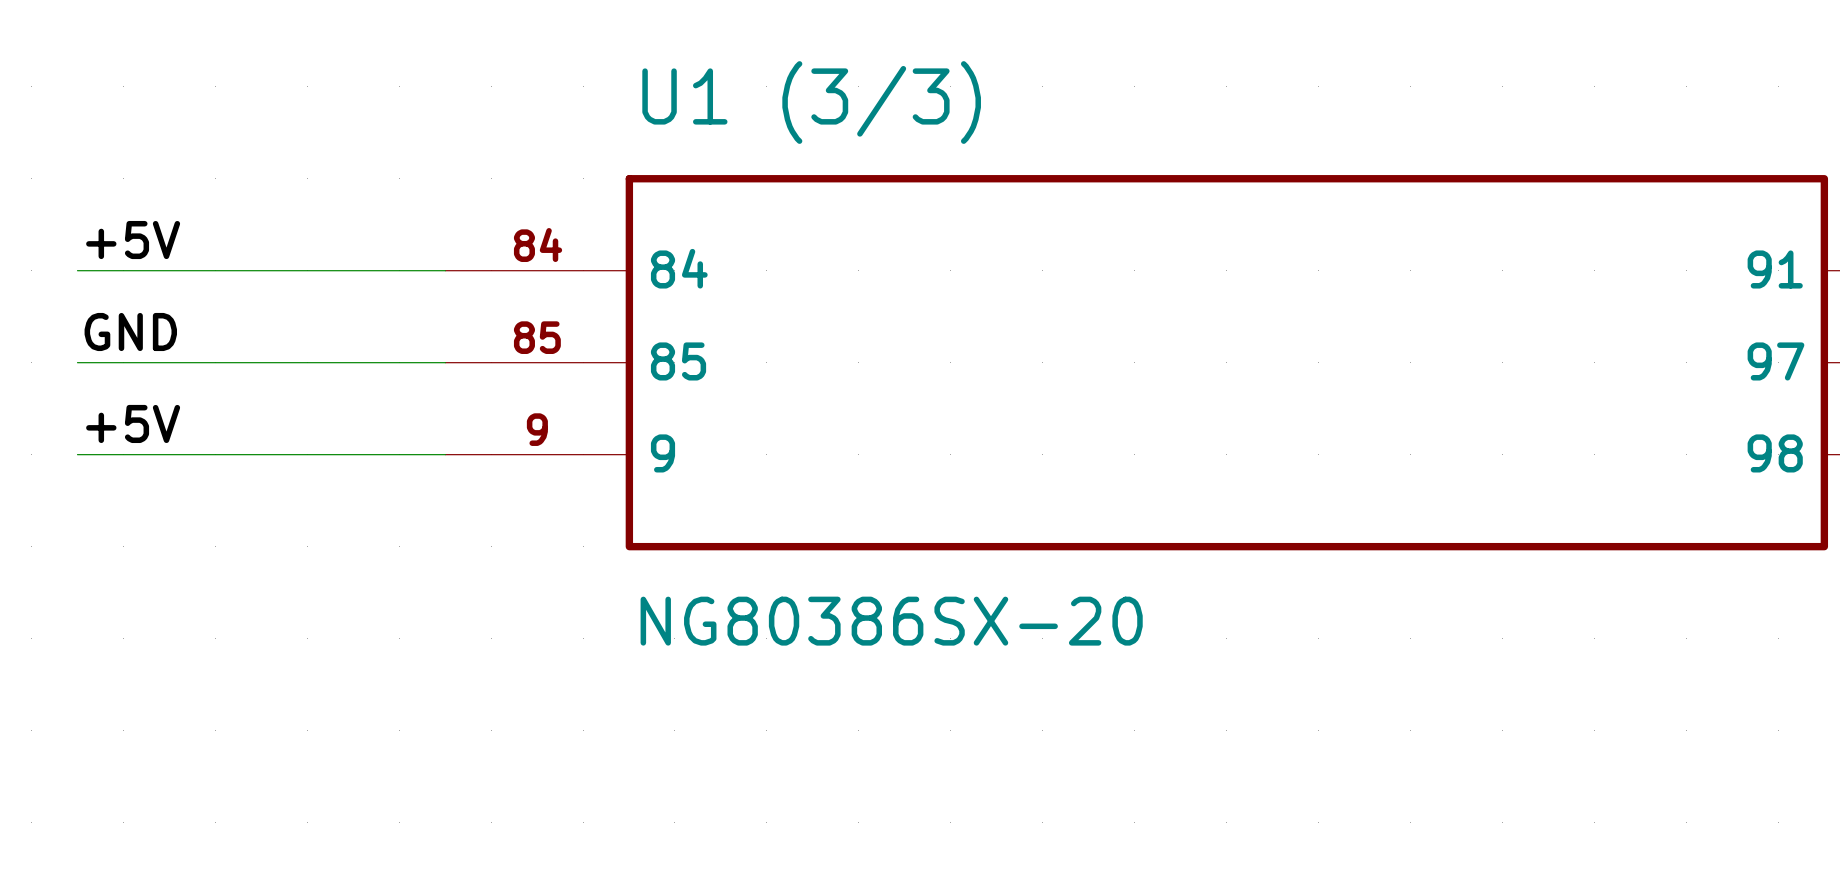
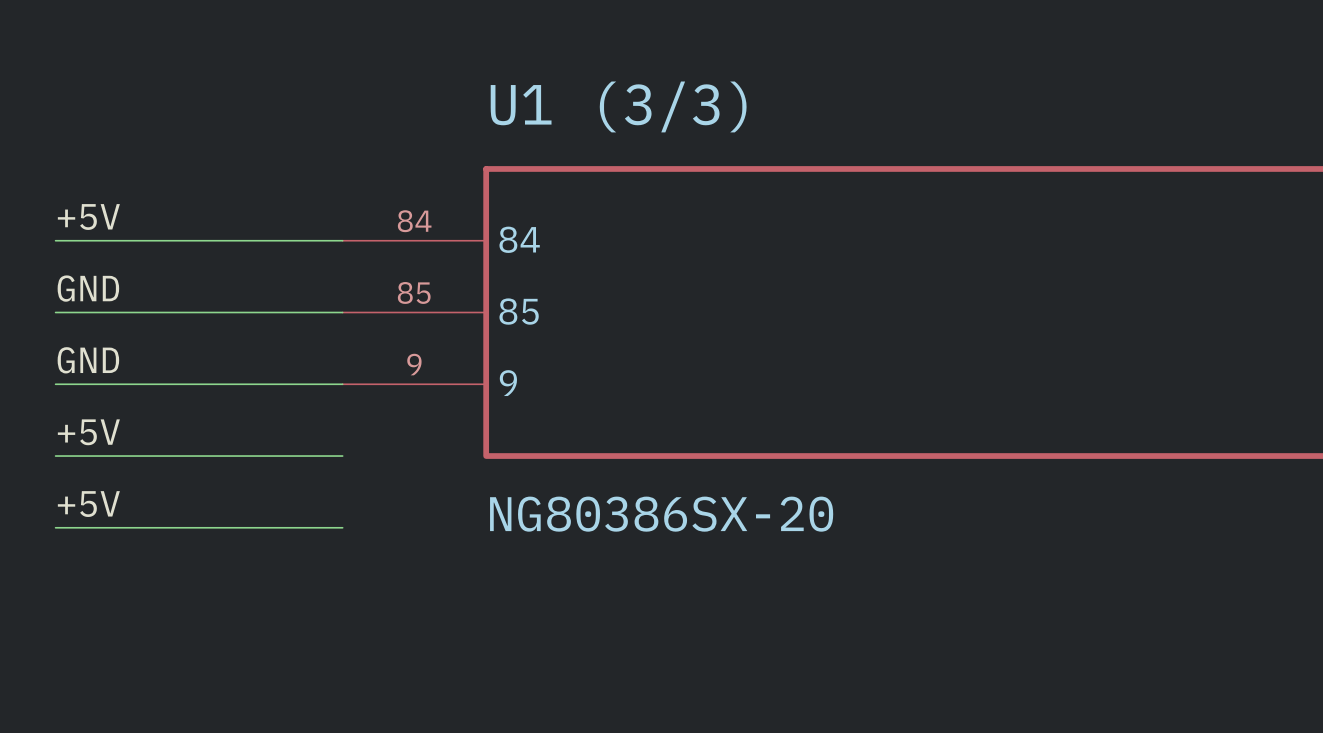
label: +5V (133, 423) -> GND (88, 360)
label: none -> +5V (88, 432)
wire: none -> (55, 456) (342, 456)
label: none -> +5V (88, 504)
wire: none -> (55, 527) (342, 527)

